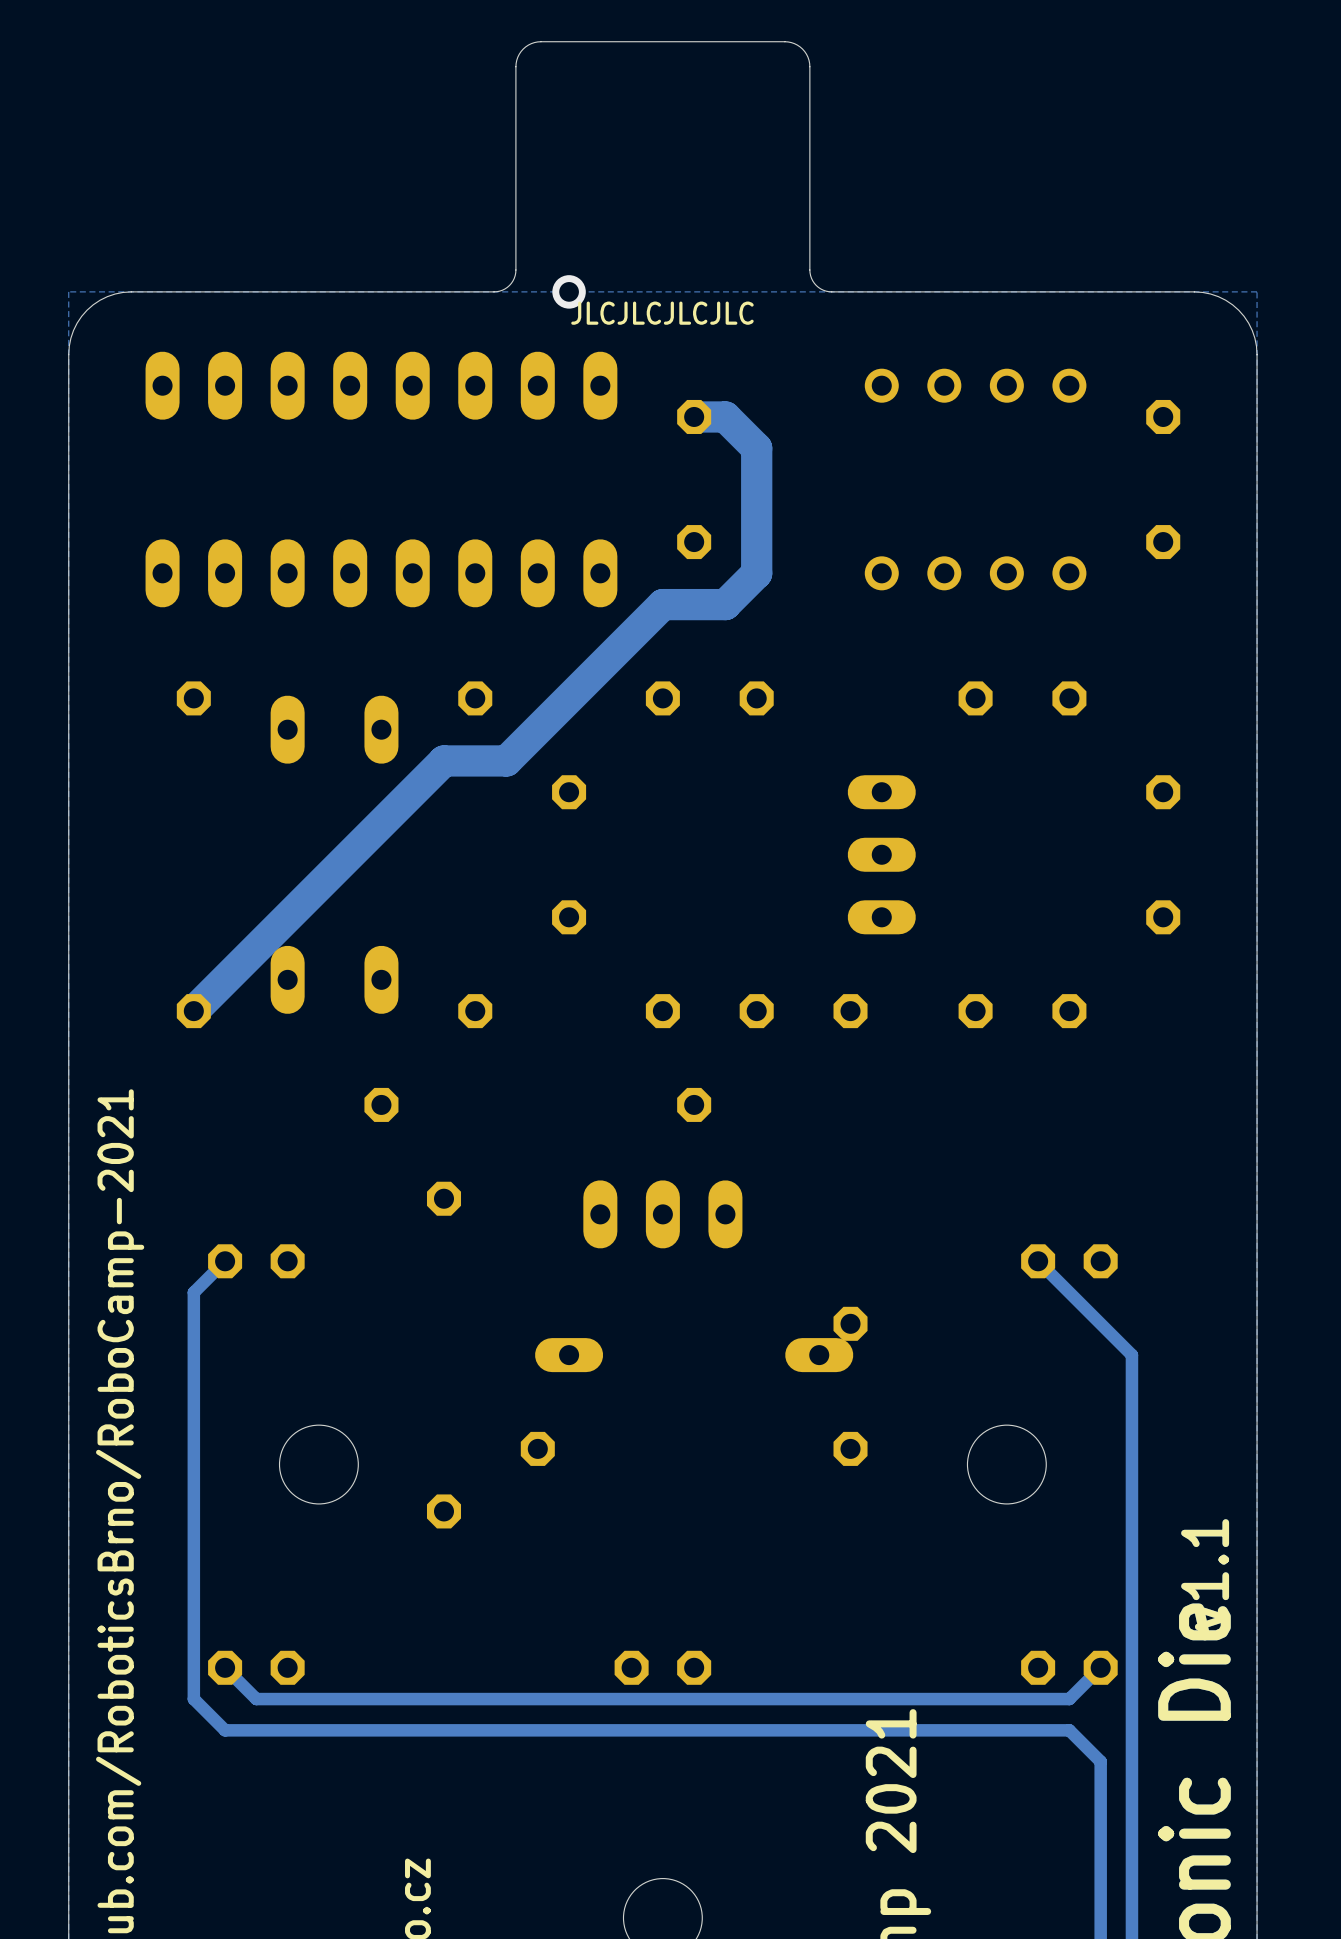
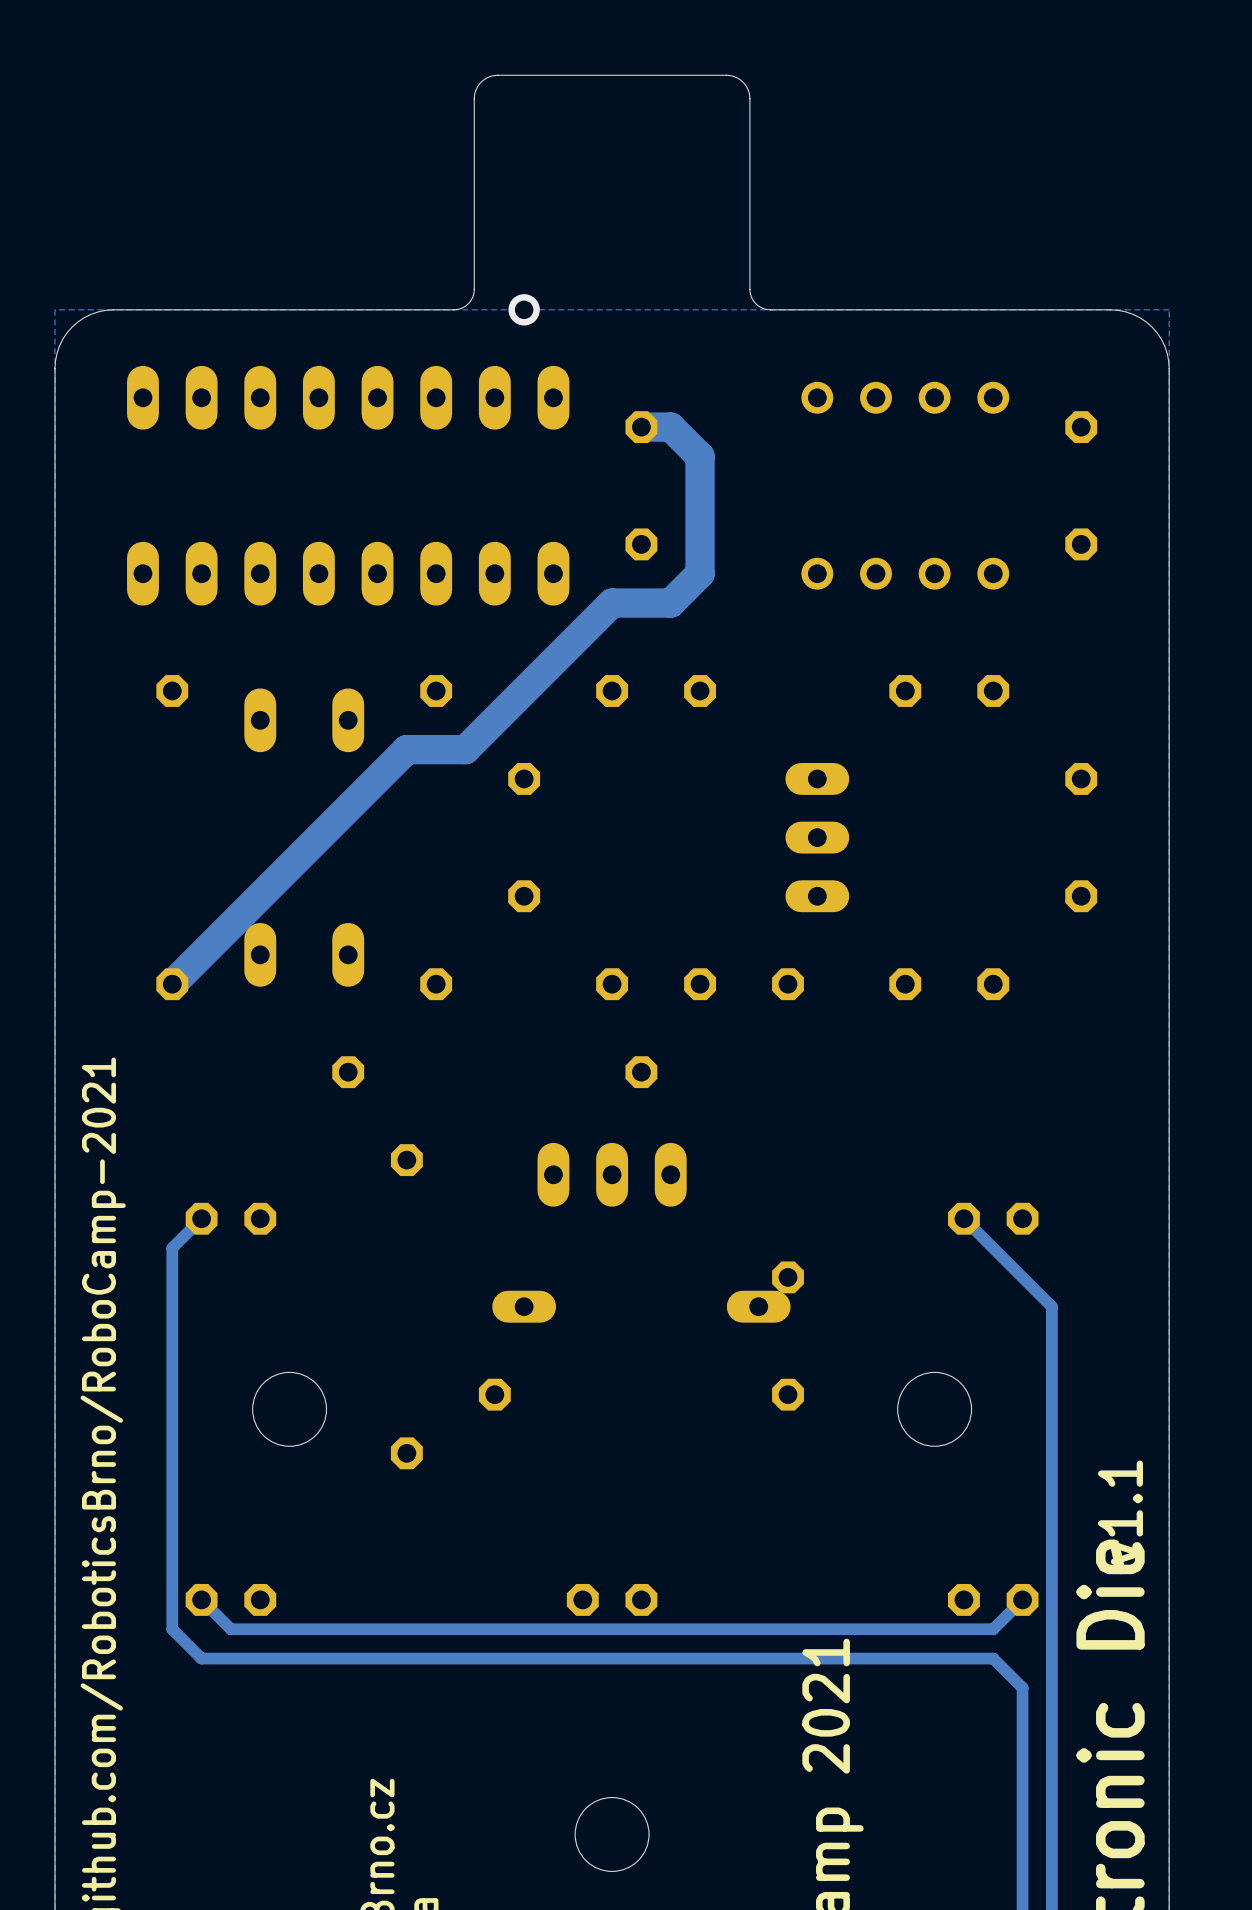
text: JLCJLCJLCJLC (662, 313) -> none

